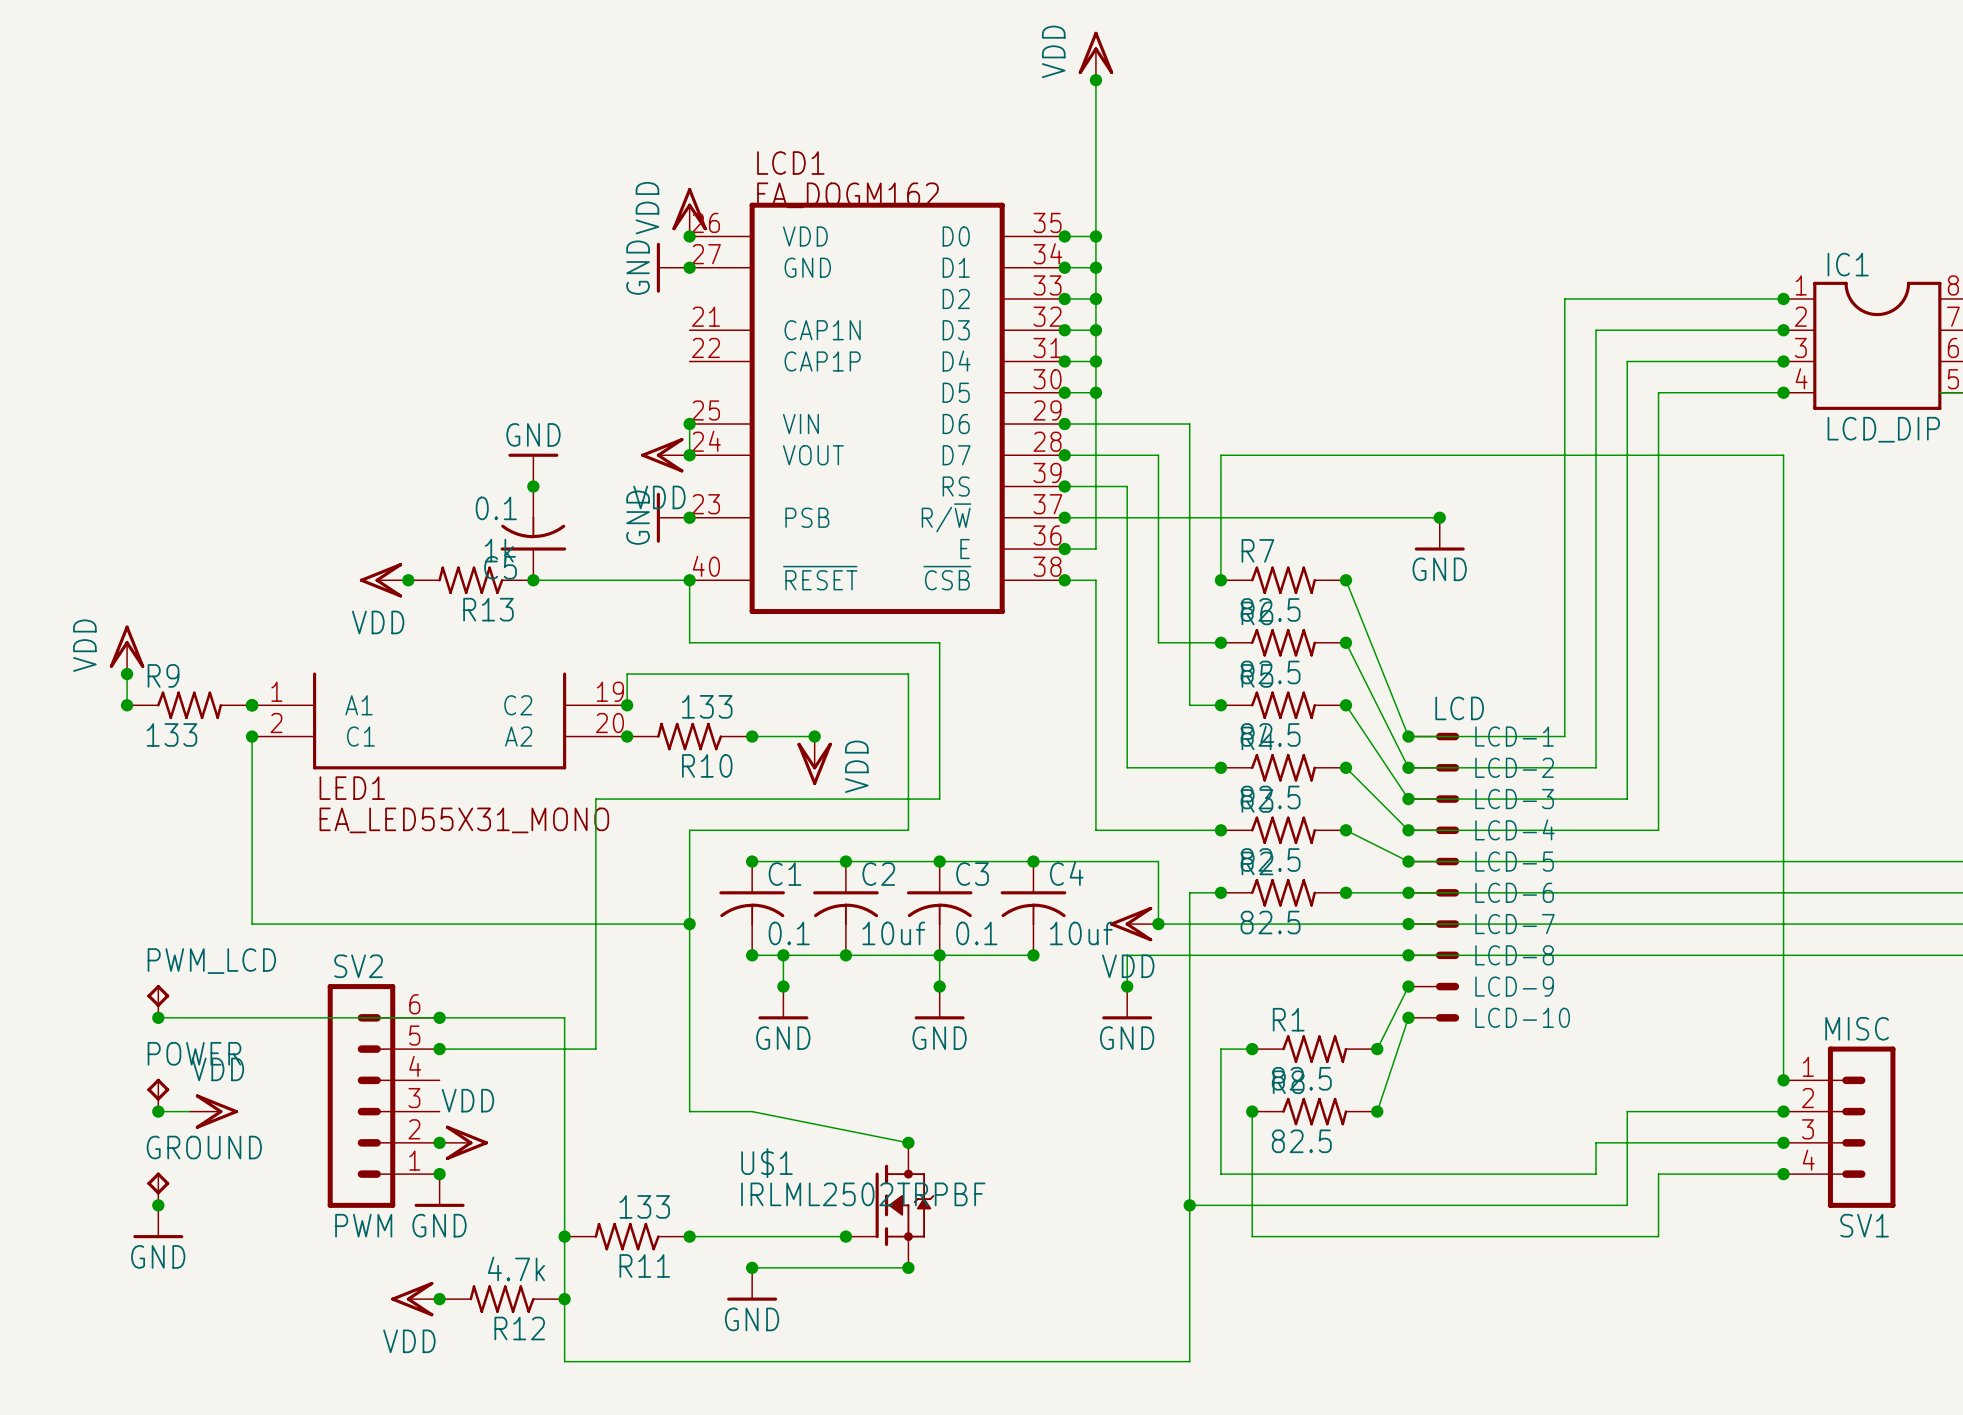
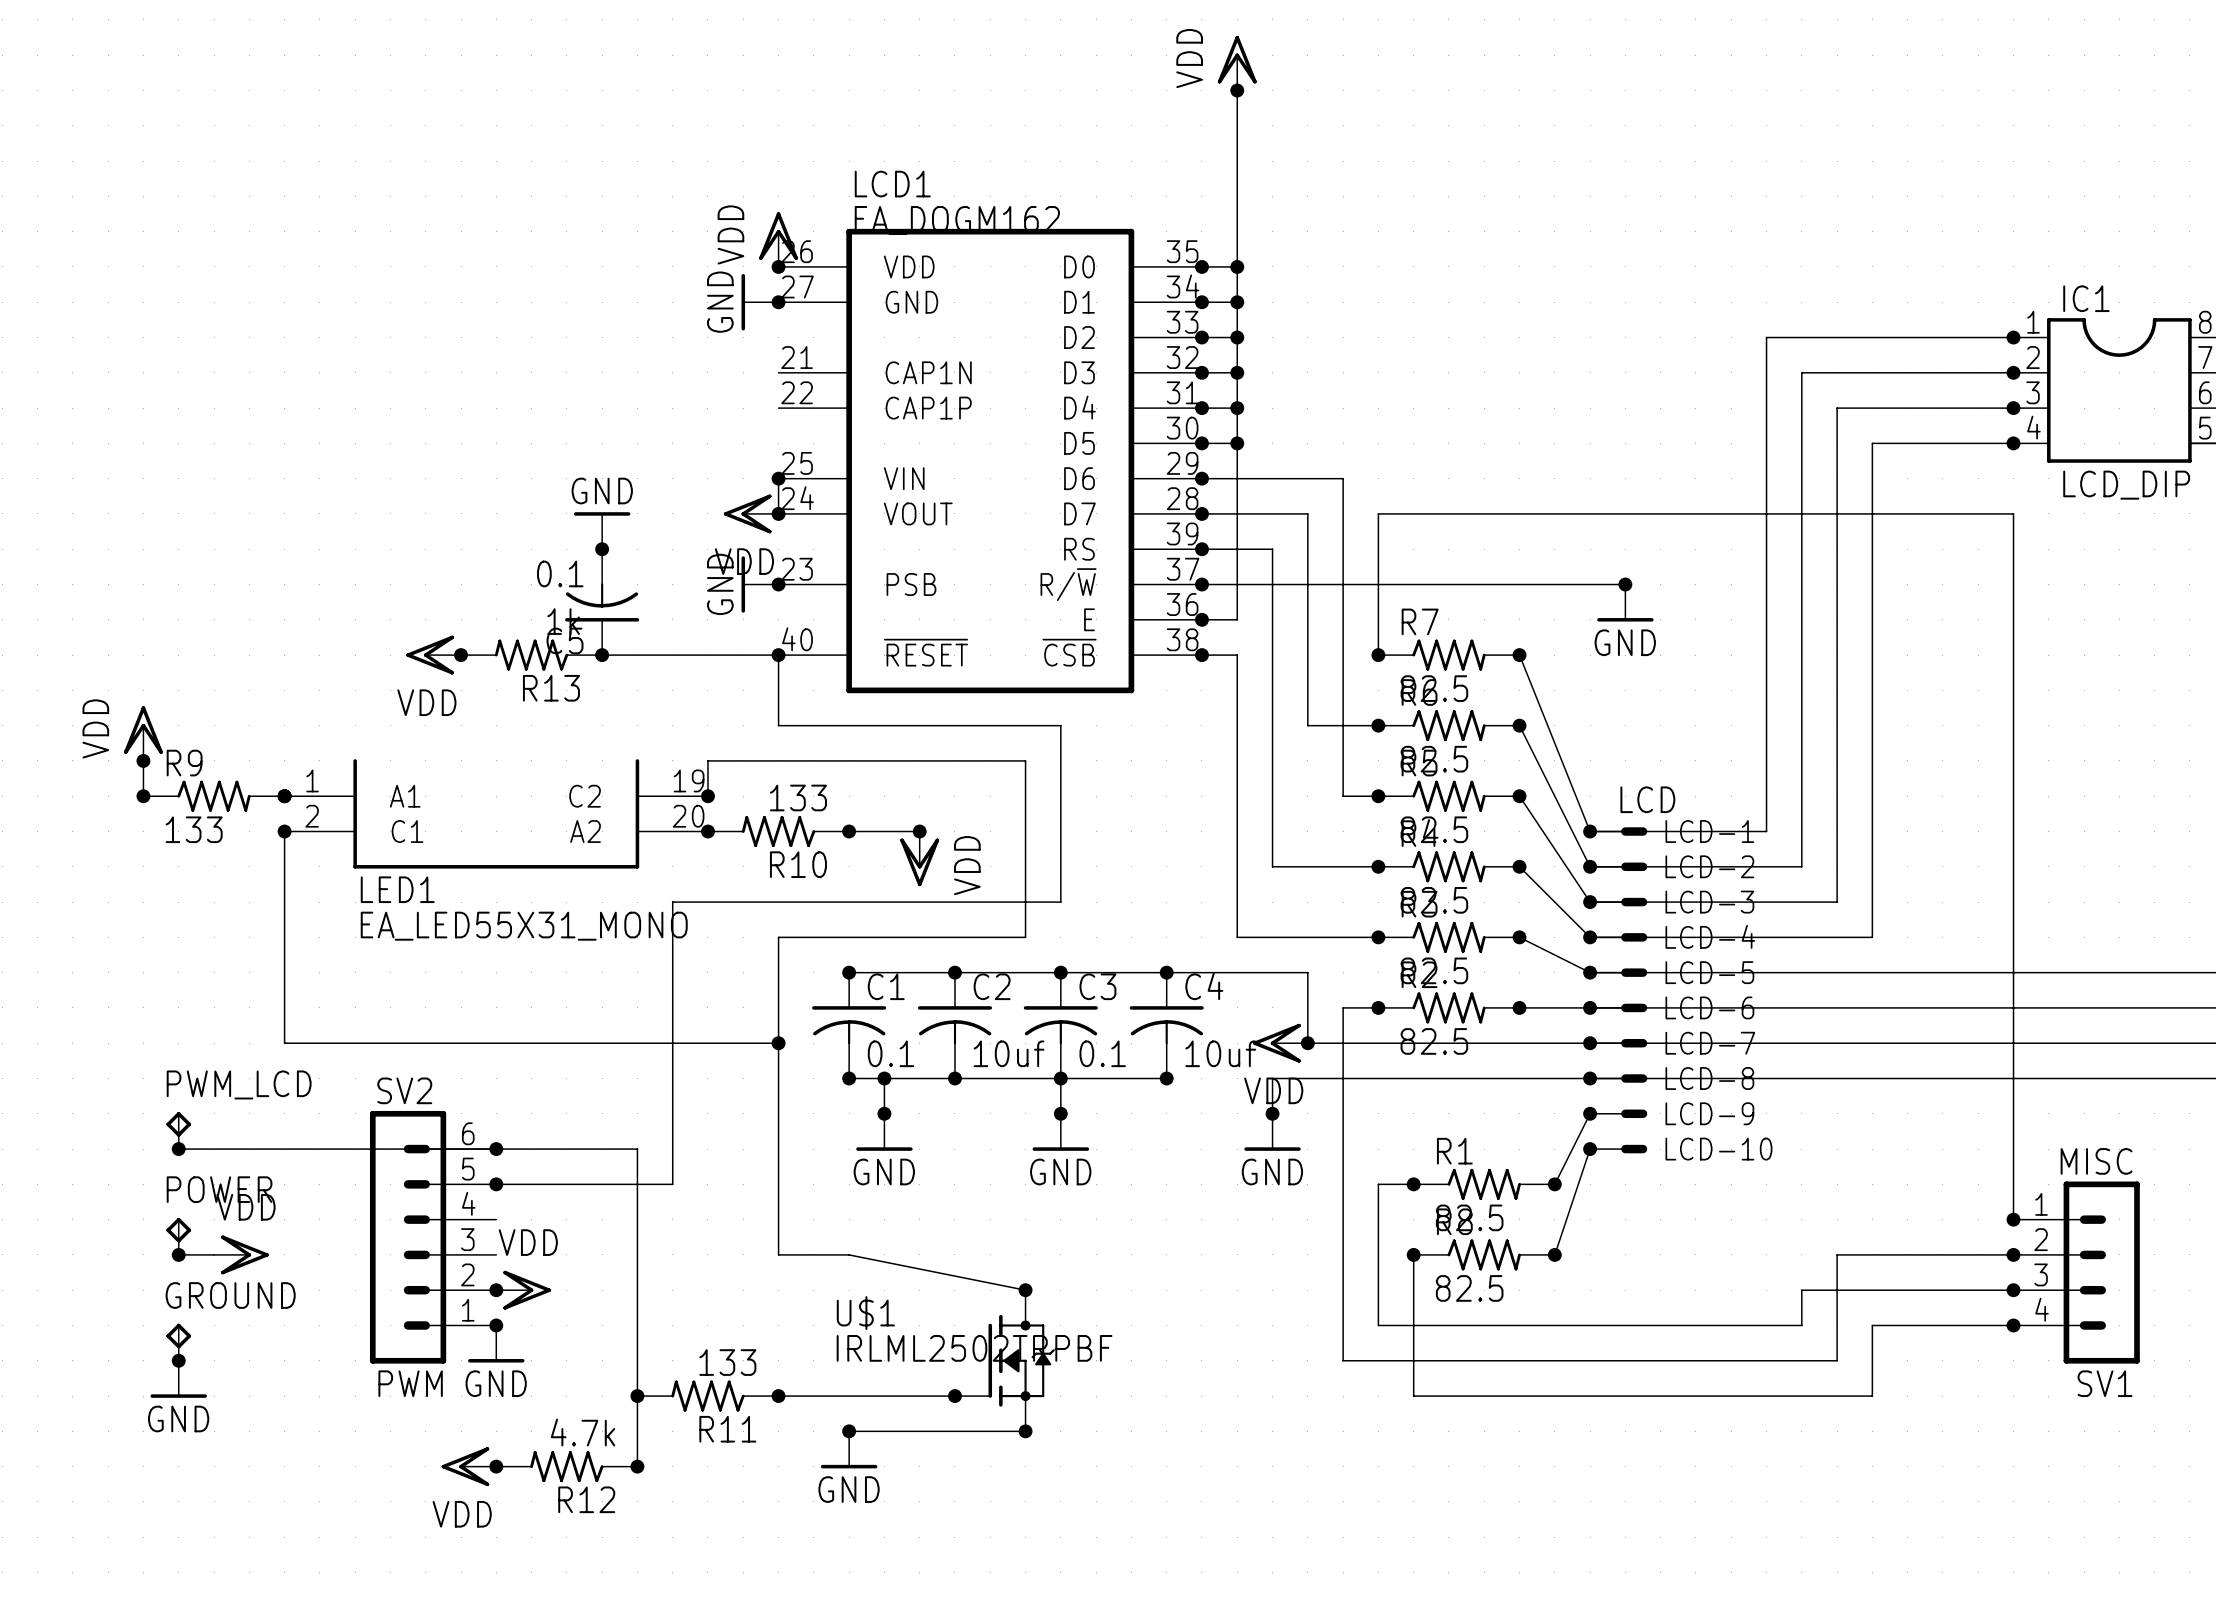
wire: (1189, 1205) (1189, 1361) (564, 1361) (564, 1299) -> none
junction: (1189, 1205) -> none

